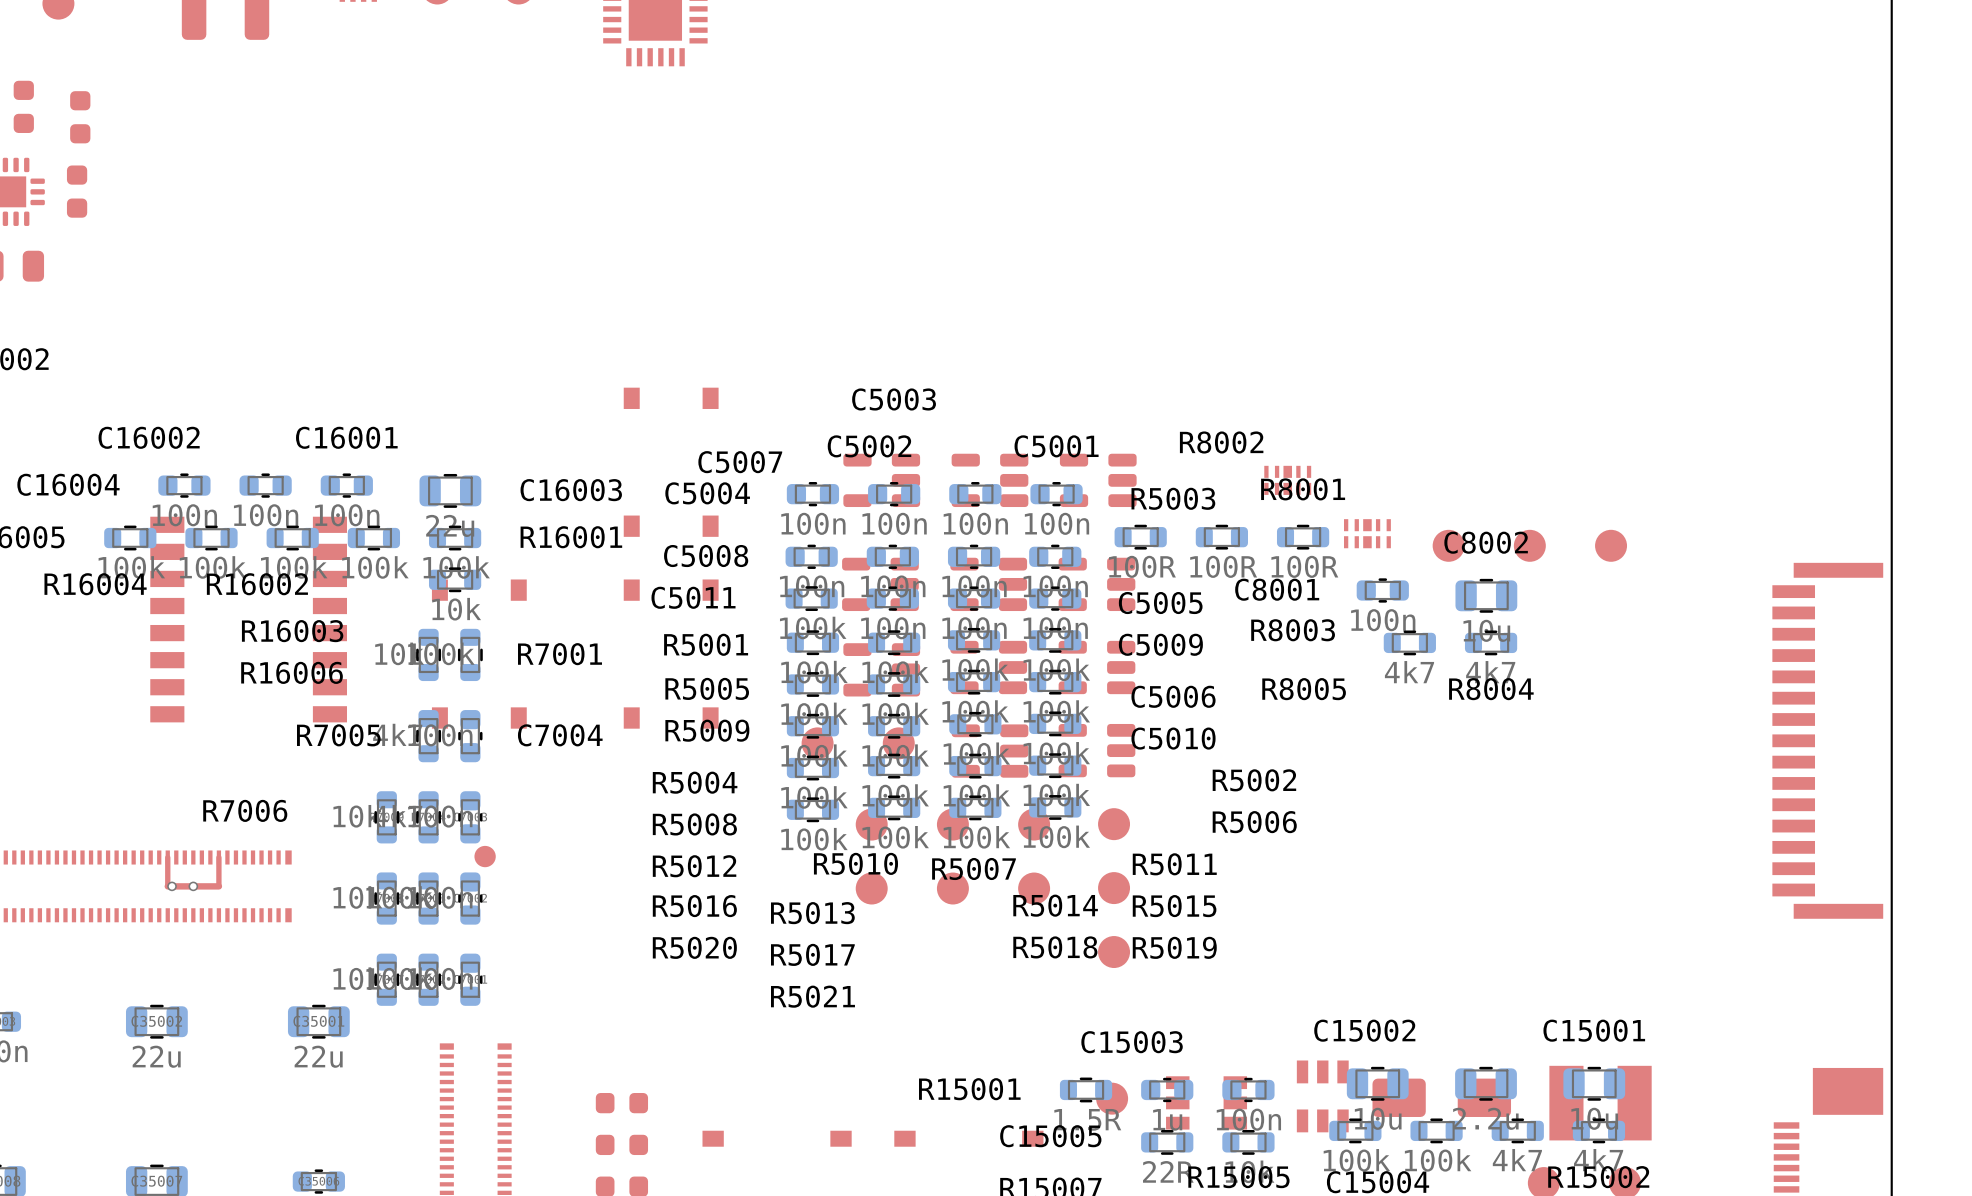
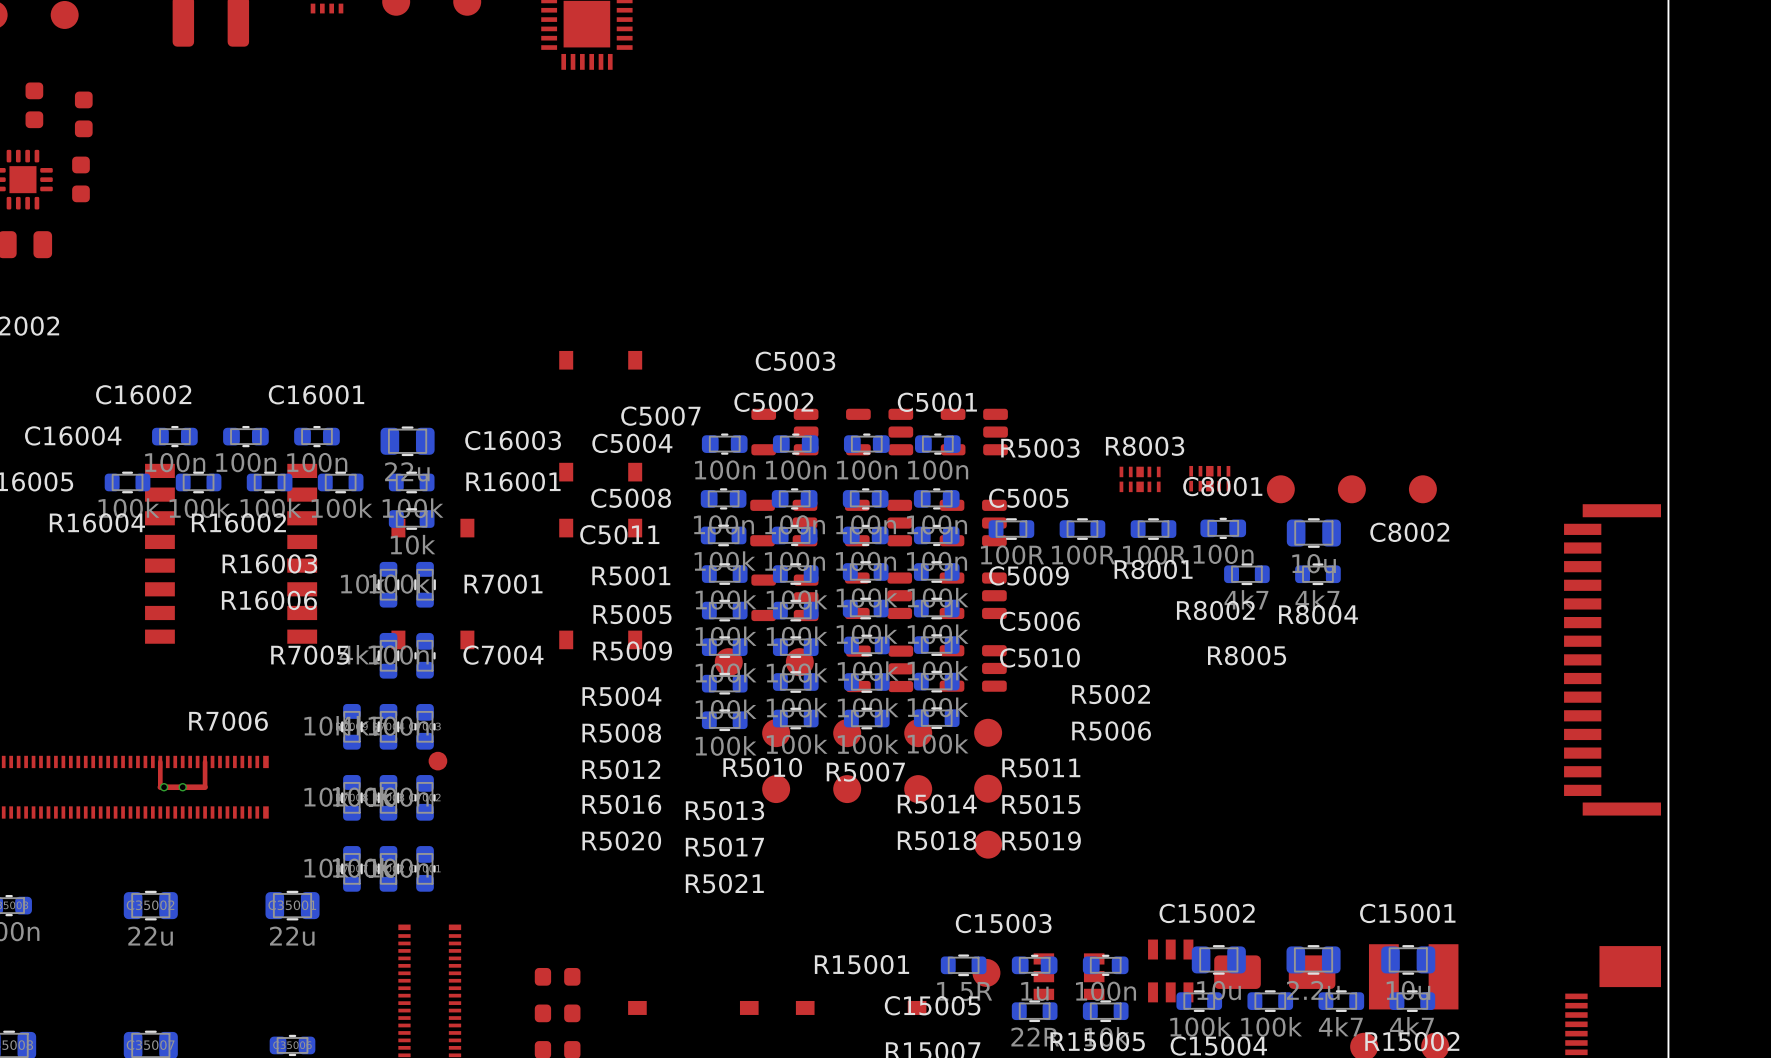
R8002 name position: R8002 (1221, 442) -> R8002 (1215, 610)
part position: (1287, 480) -> (1140, 479)
R8001 name position: R8001 (1303, 489) -> R8001 (1153, 569)
R8003 position: (1140, 537) -> (1011, 529)
R8002 position: (1221, 537) -> (1082, 529)
R8001 position: (1303, 537) -> (1153, 529)
C8002 name position: C8002 (1486, 542) -> C8002 (1409, 532)
C8001 name position: C8001 (1277, 589) -> C8001 (1222, 486)
C5005 name position: C5005 (1160, 603) -> C5005 (1028, 498)
R8003 name position: R8003 (1293, 630) -> R8003 (1145, 446)
R8005 name position: R8005 (1304, 689) -> R8005 (1247, 655)

